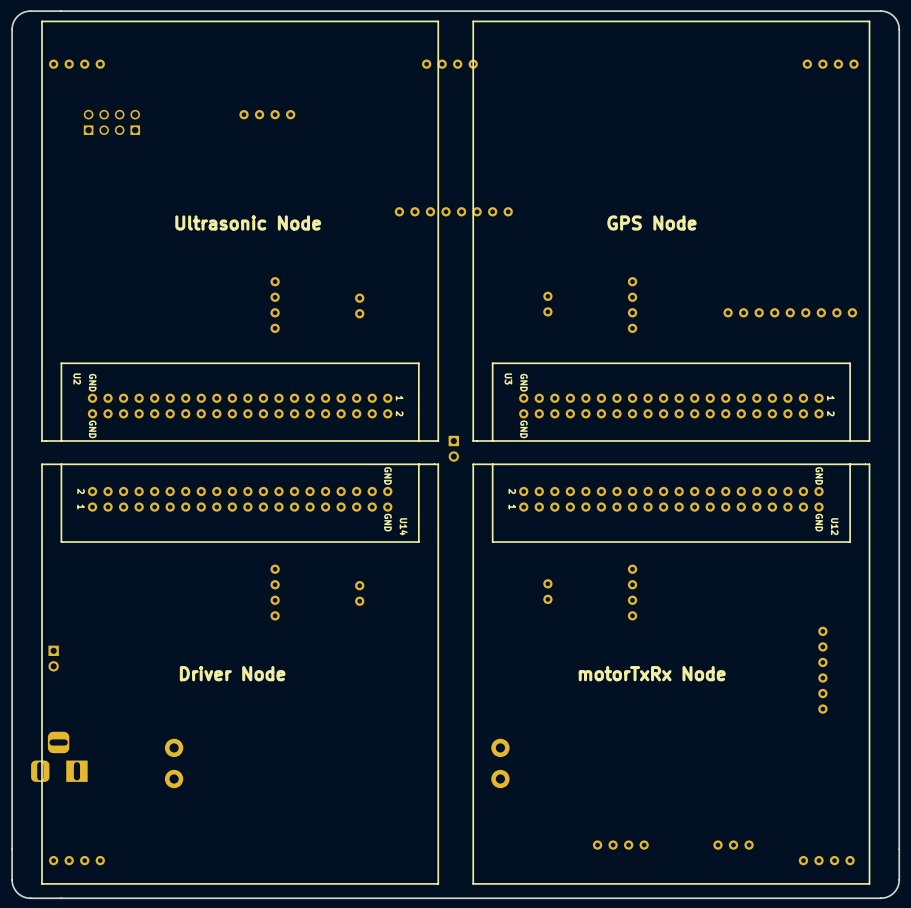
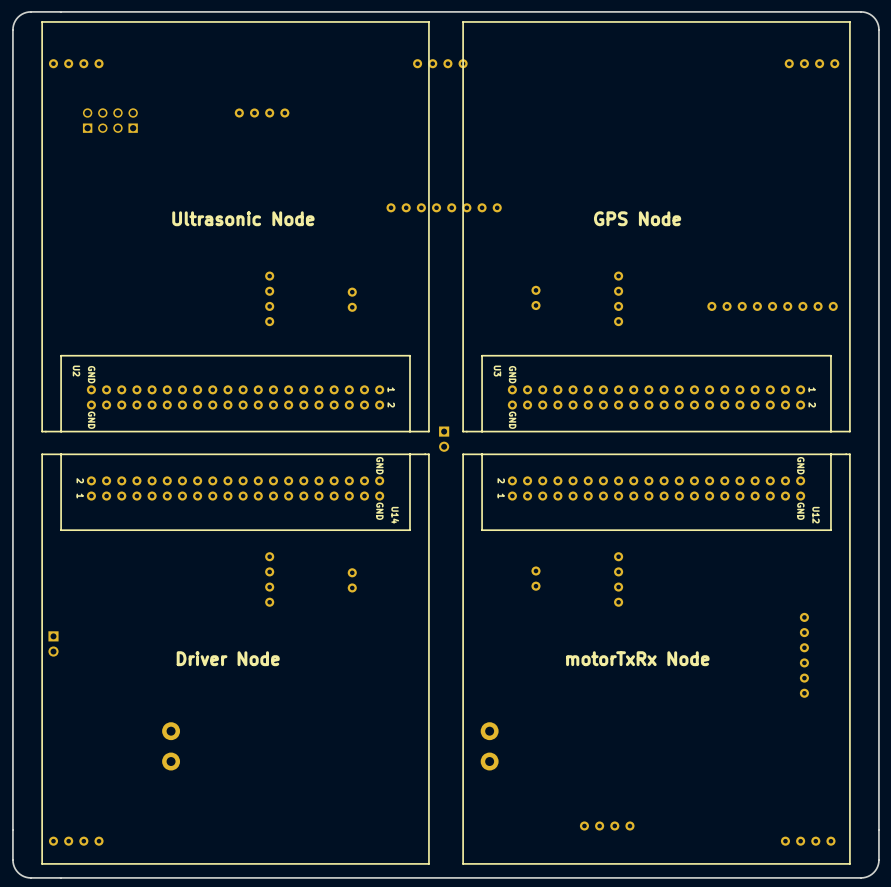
part: (59, 756) -> none
part: (733, 845) -> none

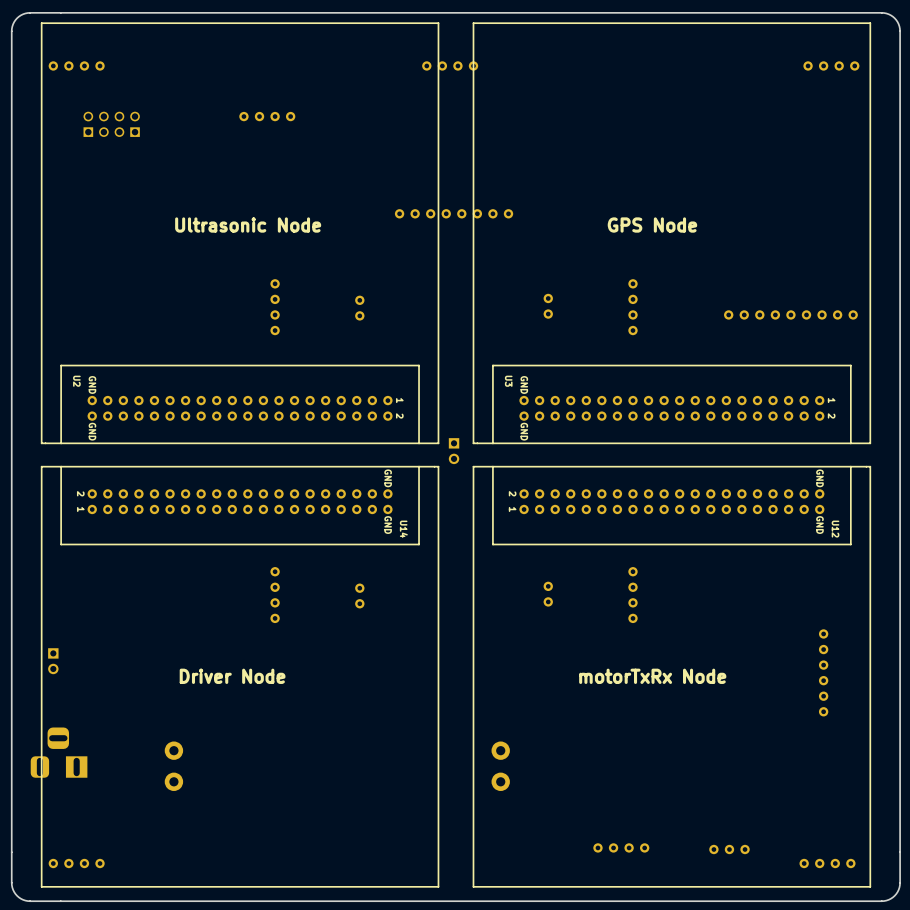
part: none -> (59, 752)
part: none -> (729, 849)

